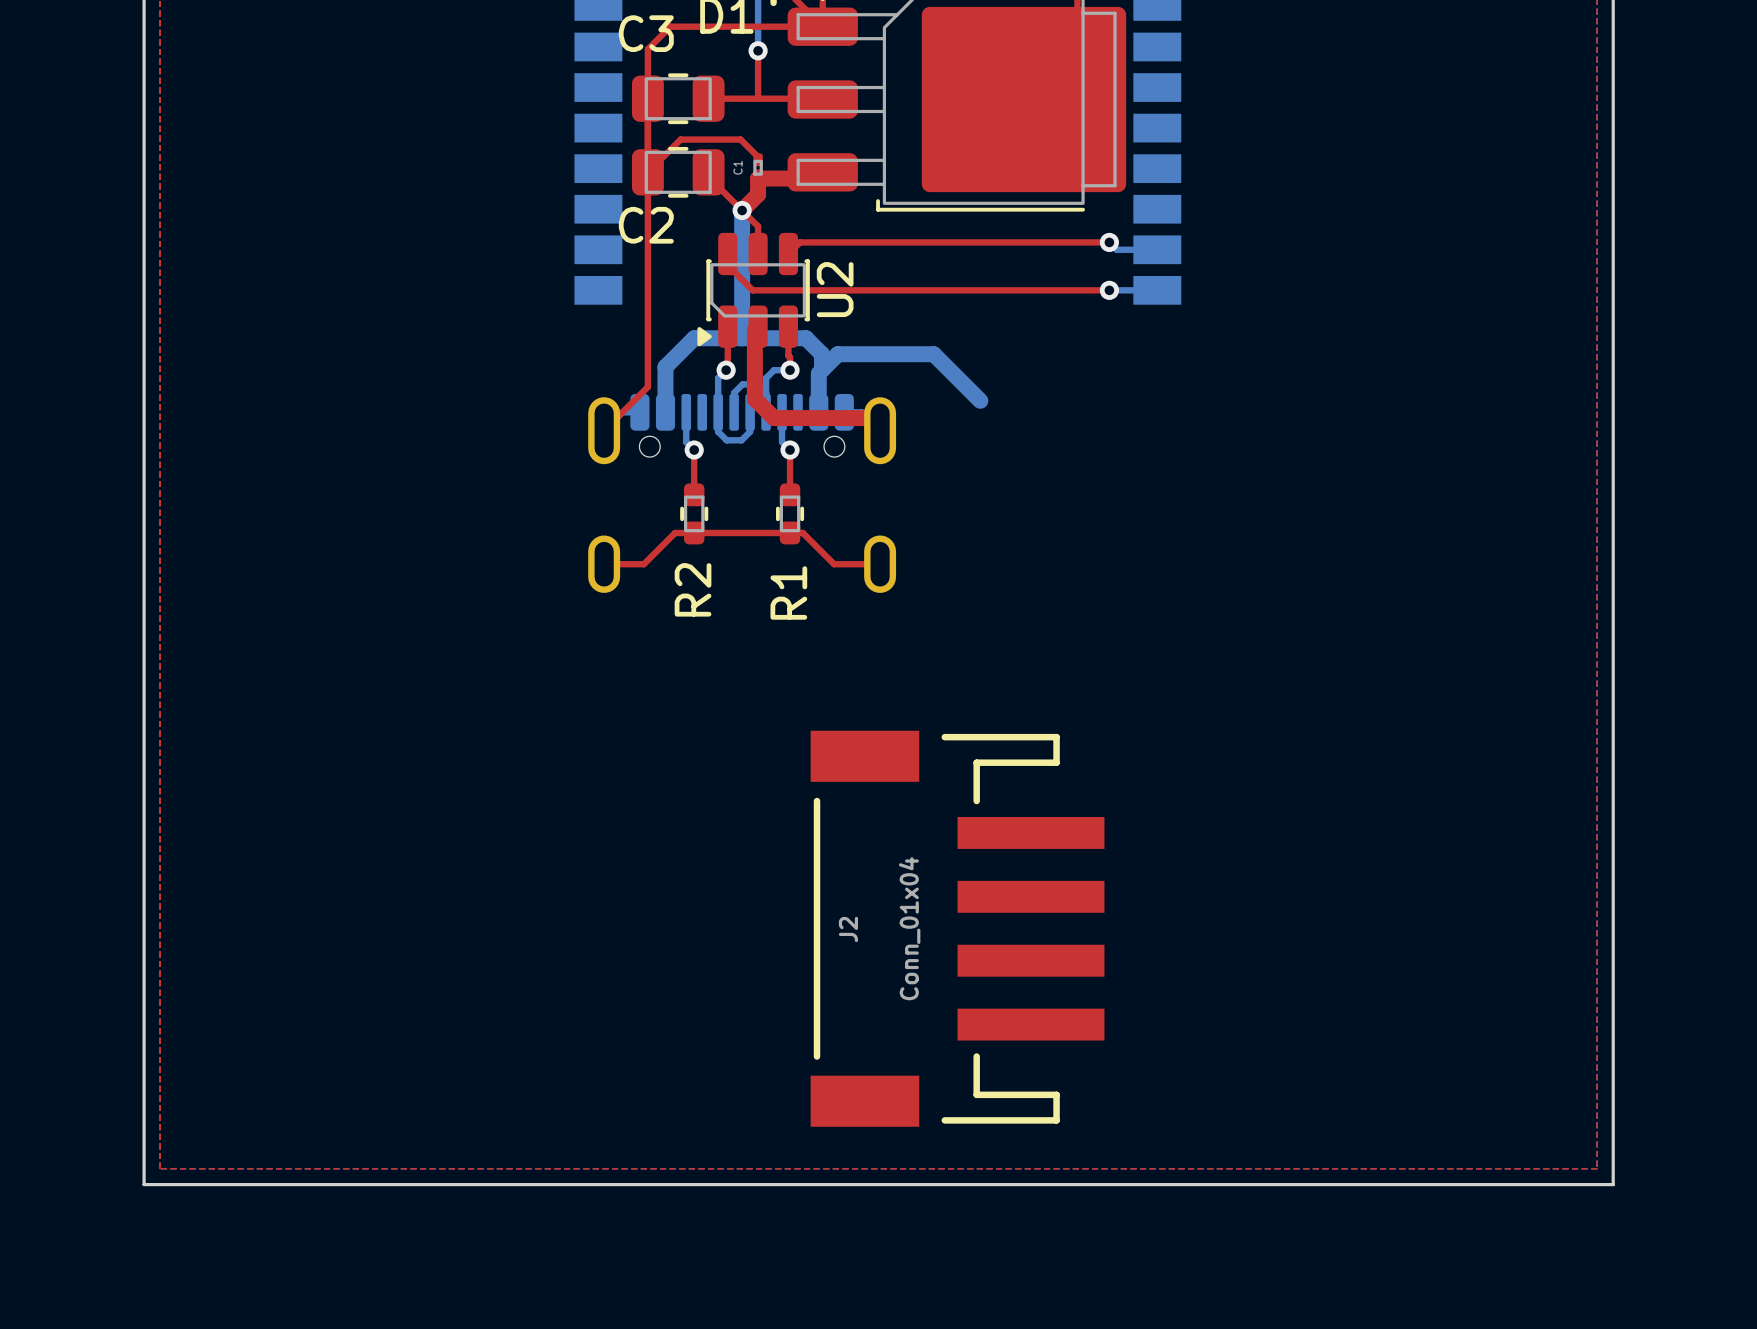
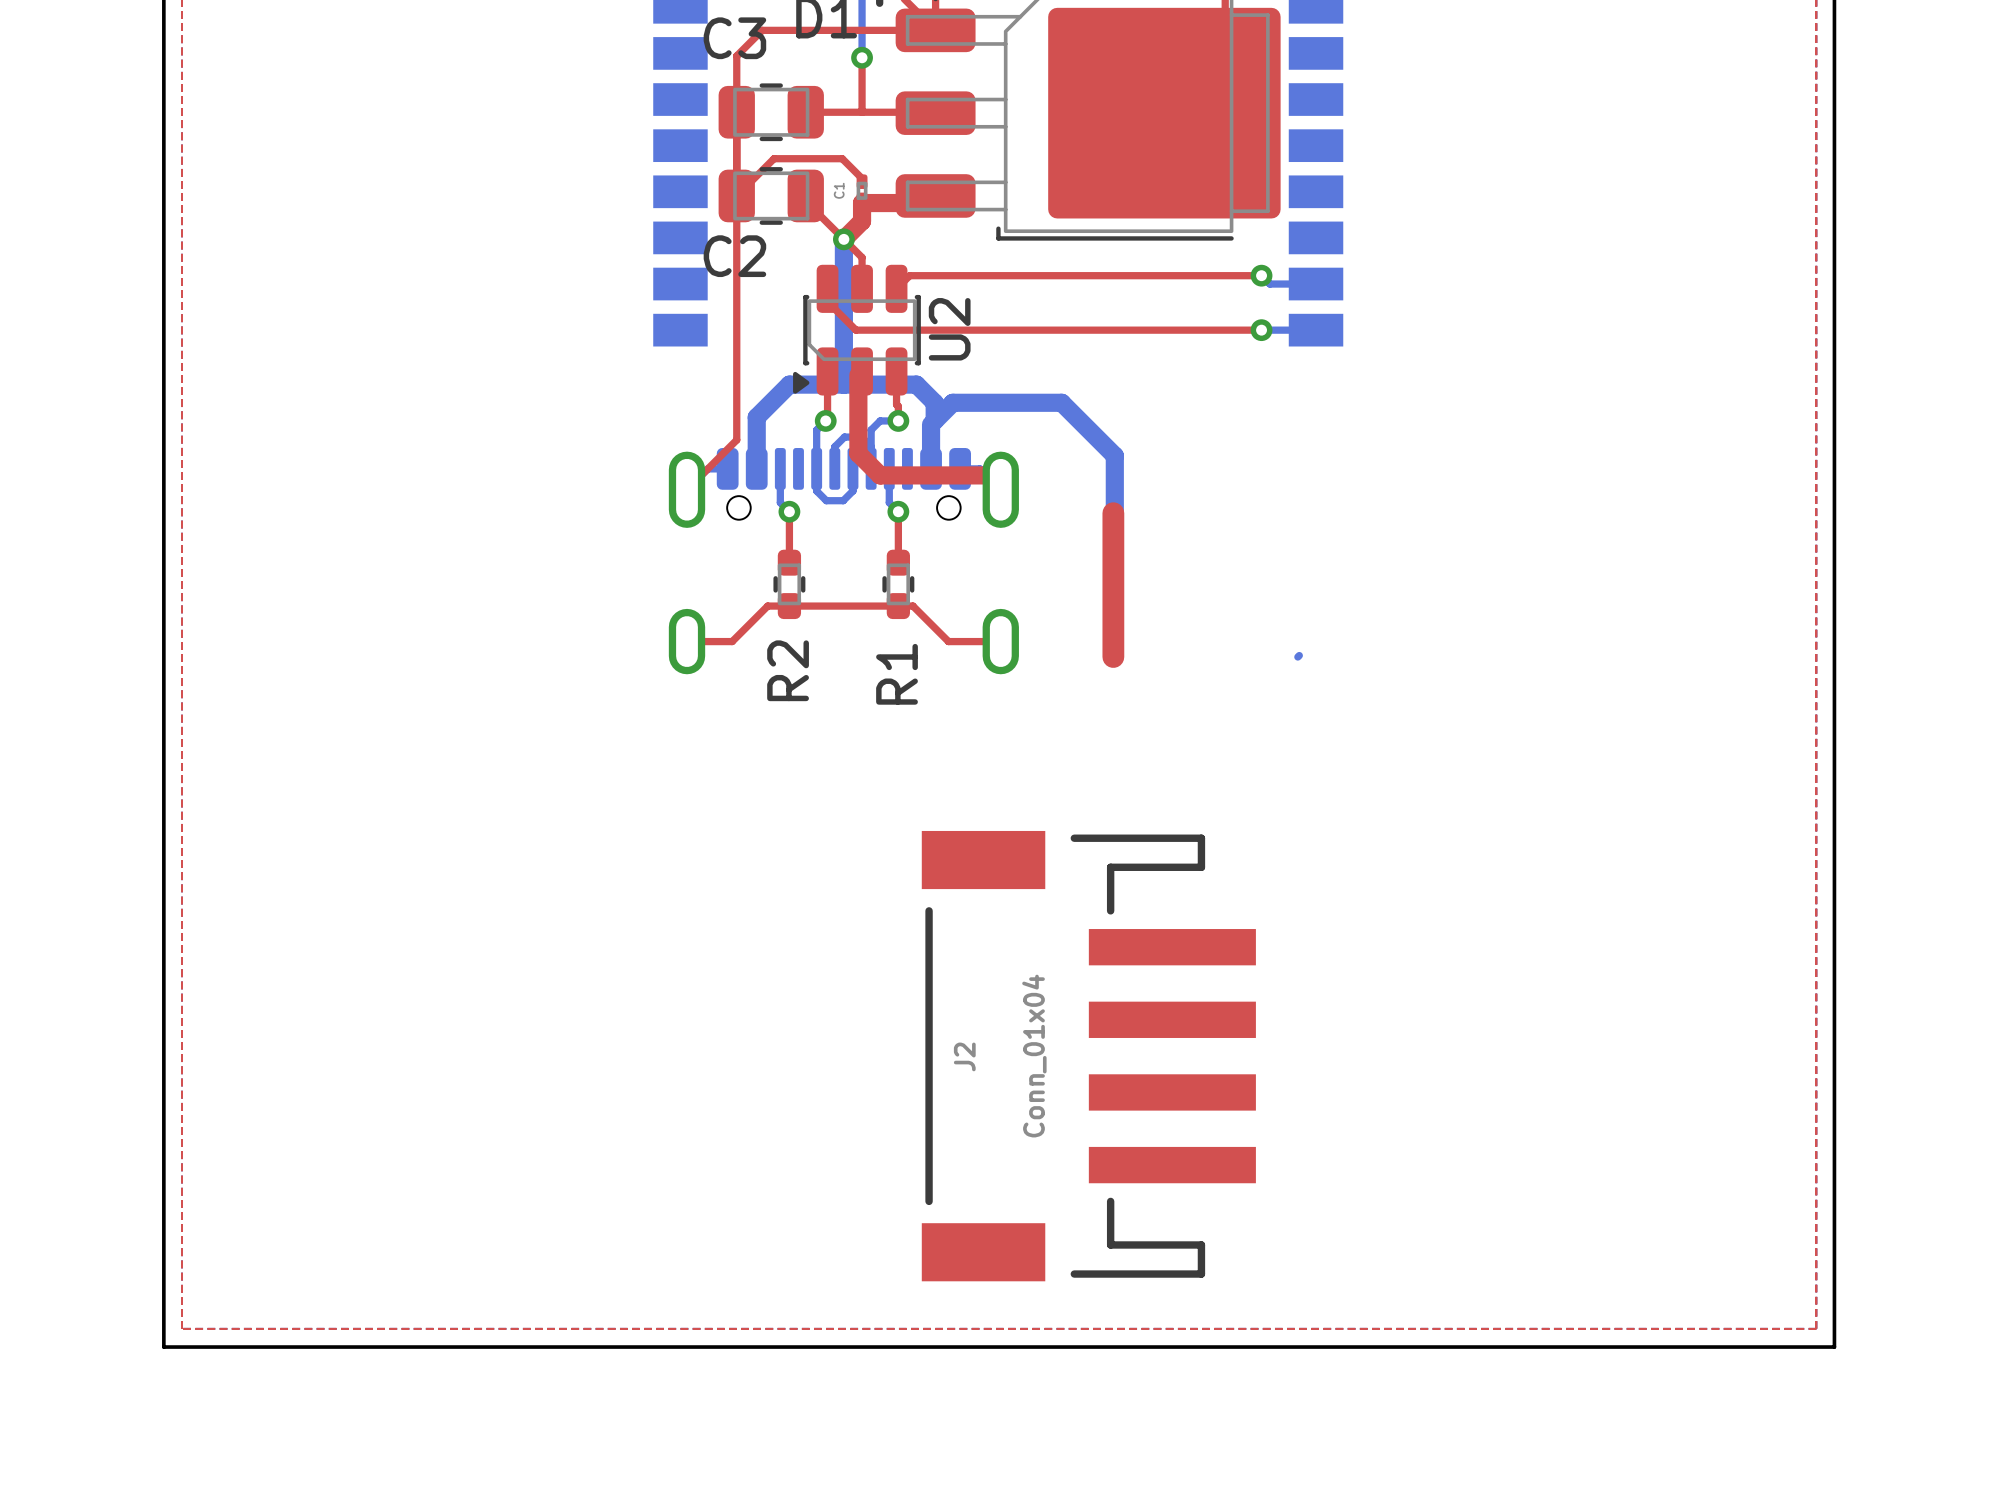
bottom track: none -> (1114, 455) (1114, 511)
top track: none -> (1114, 511) (1113, 657)
bottom track: none -> (1299, 655) (1297, 657)

